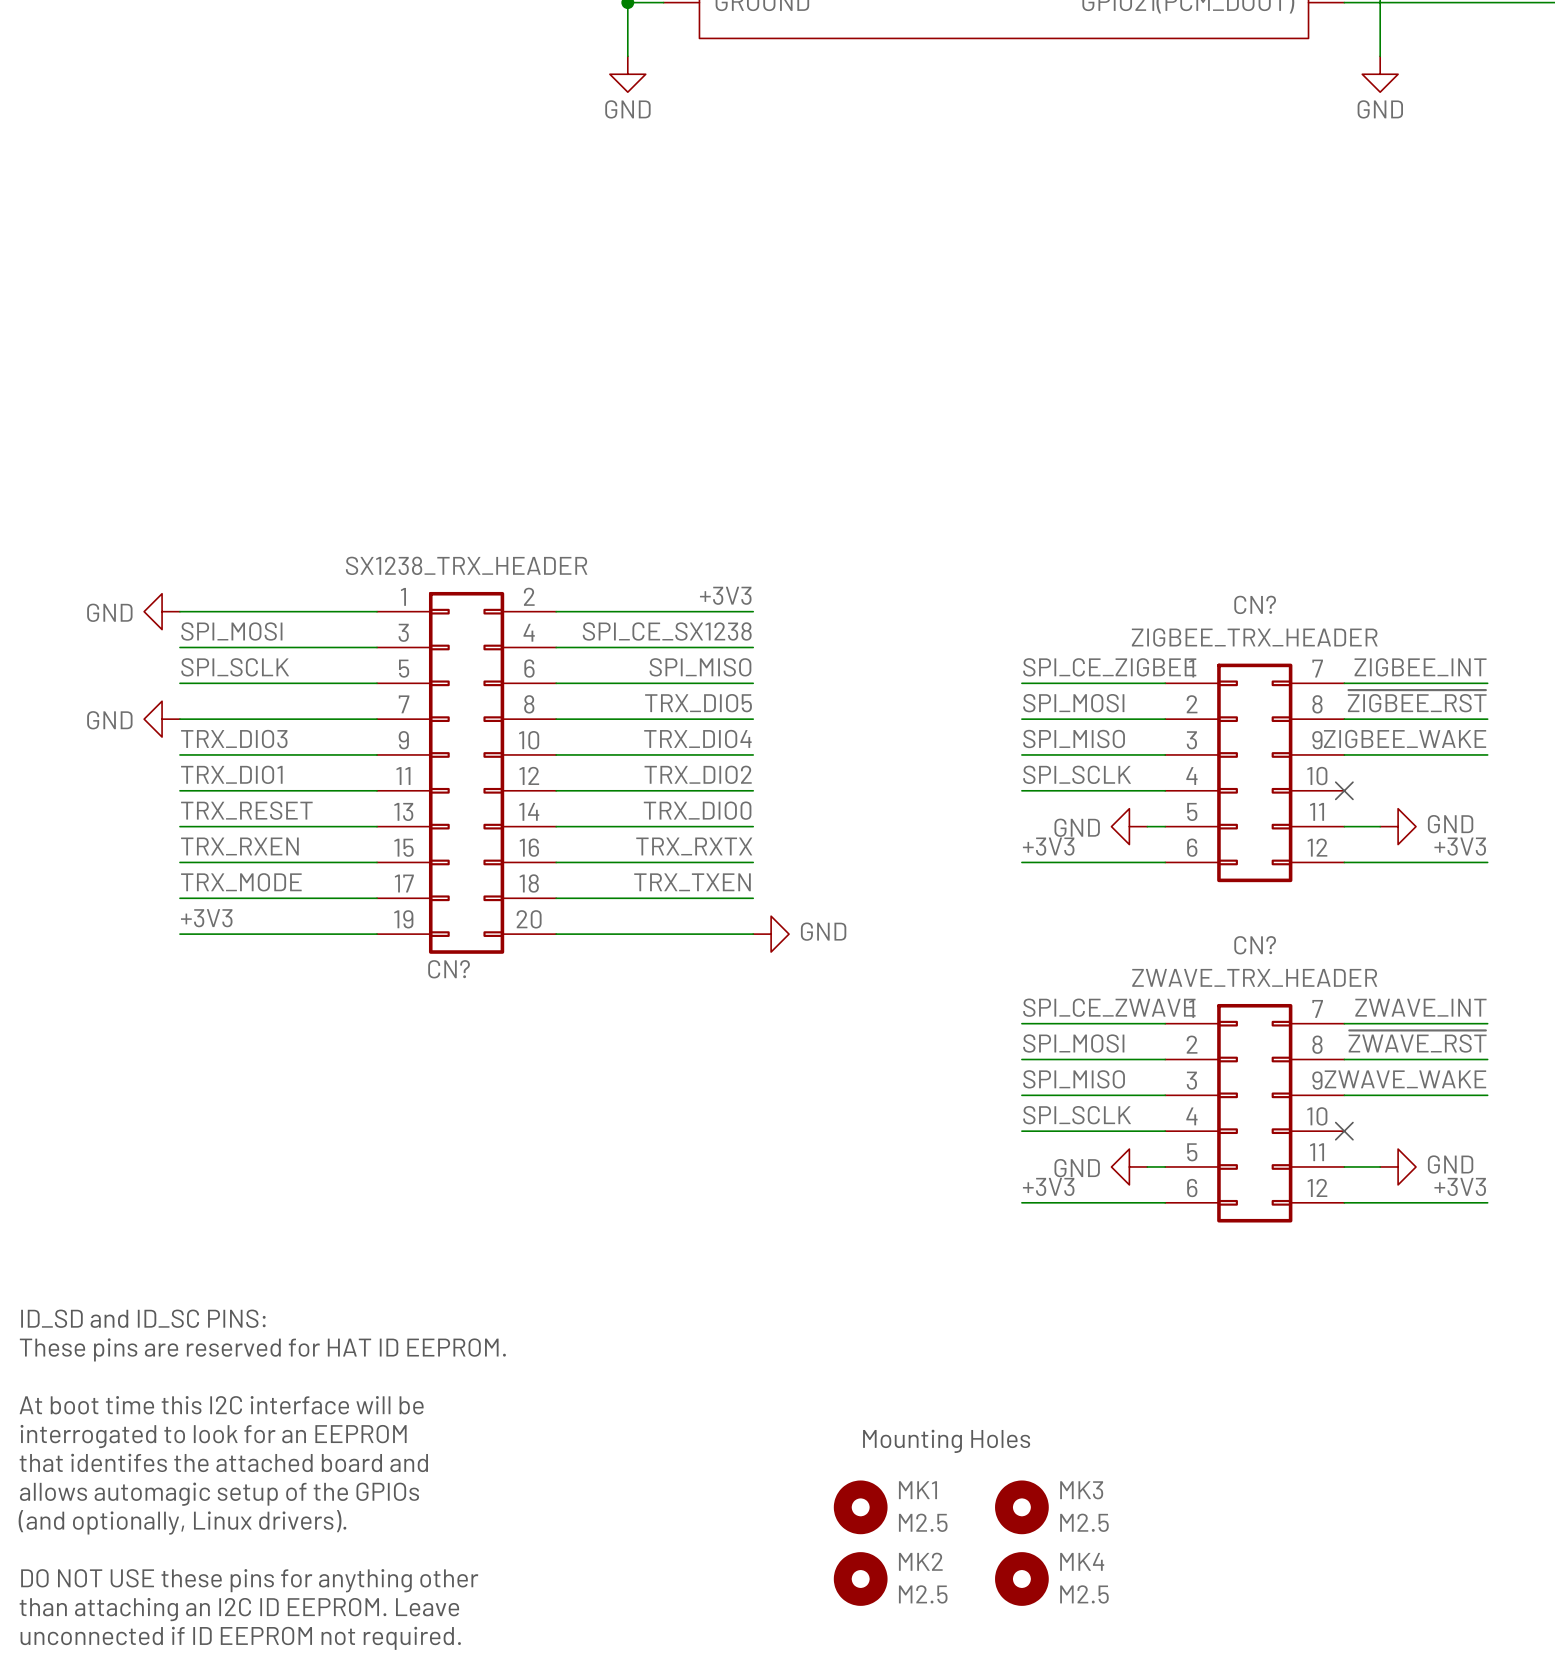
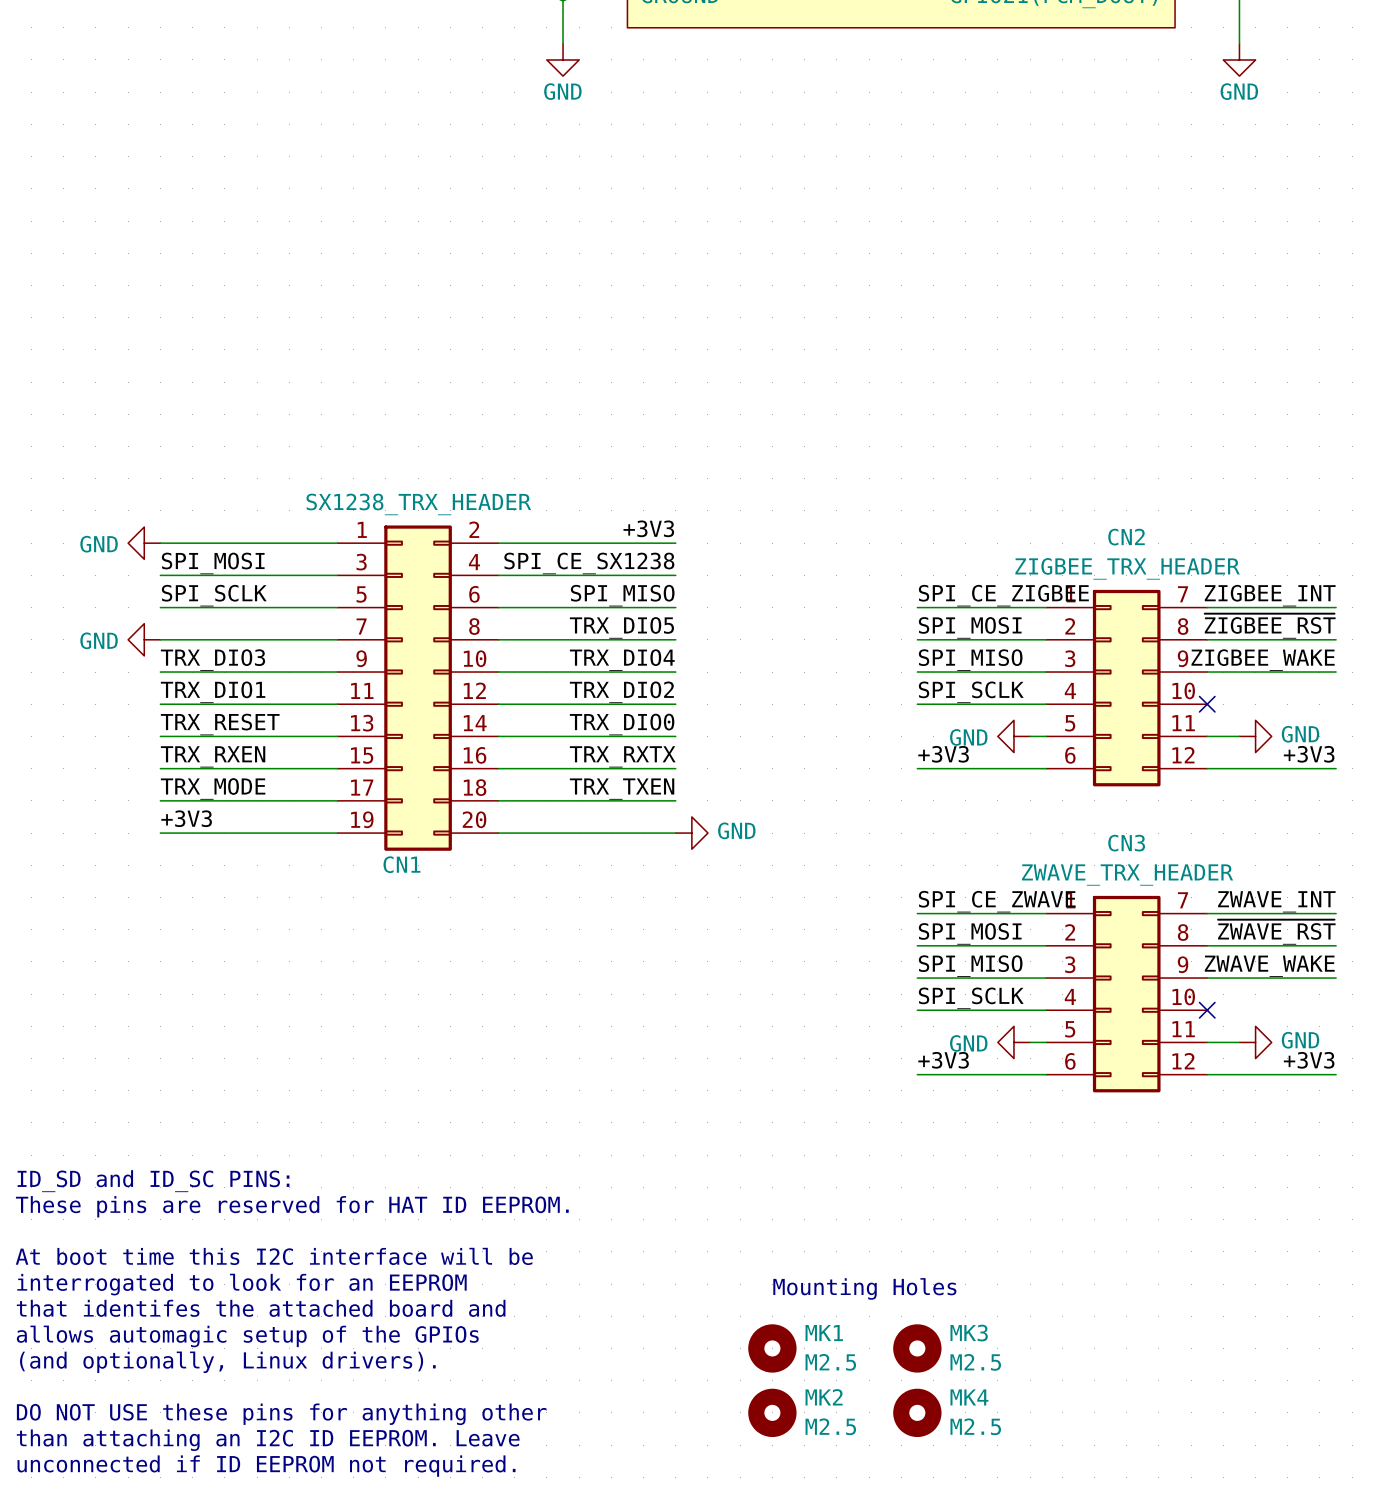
CN? name: CN? (1255, 604) -> CN2 (1126, 537)
CN? name: CN? (1255, 945) -> CN3 (1126, 843)
CN? name: CN? (449, 969) -> CN1 (401, 864)

